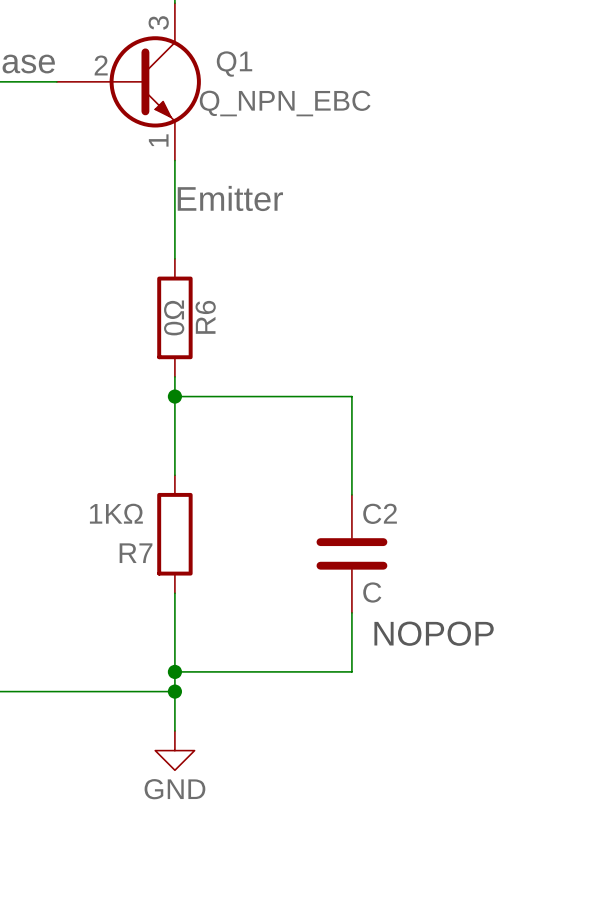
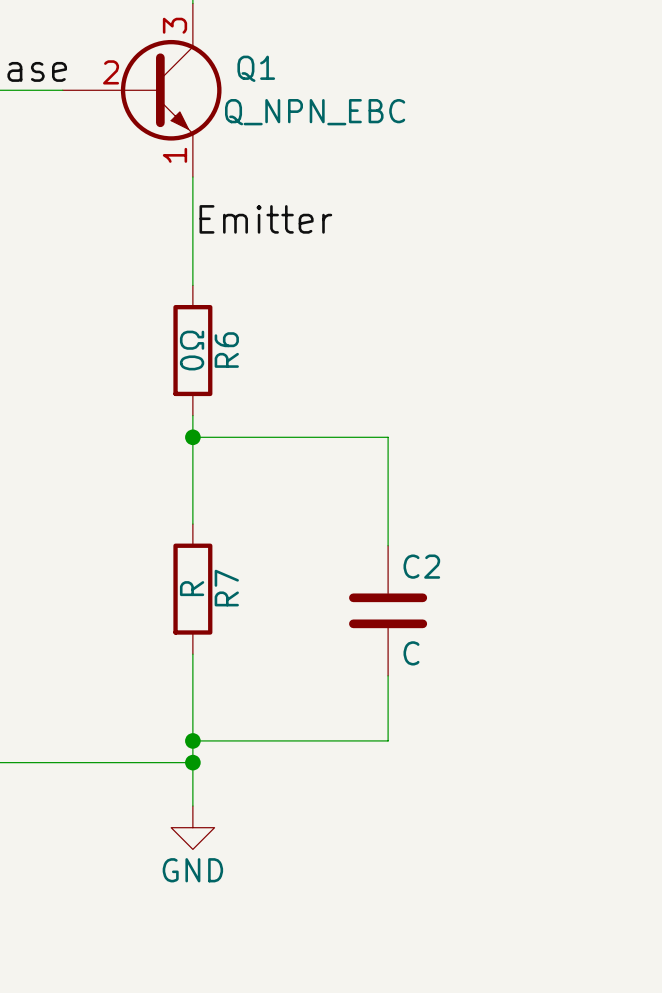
R7 value: 1KΩ (116, 513) -> R (192, 588)
R7 name rotation: 0° (136, 553) -> 90° counterclockwise (226, 588)
R7 name position: R7 (136, 553) -> R7 (226, 588)
text: NOPOP (434, 633) -> none

